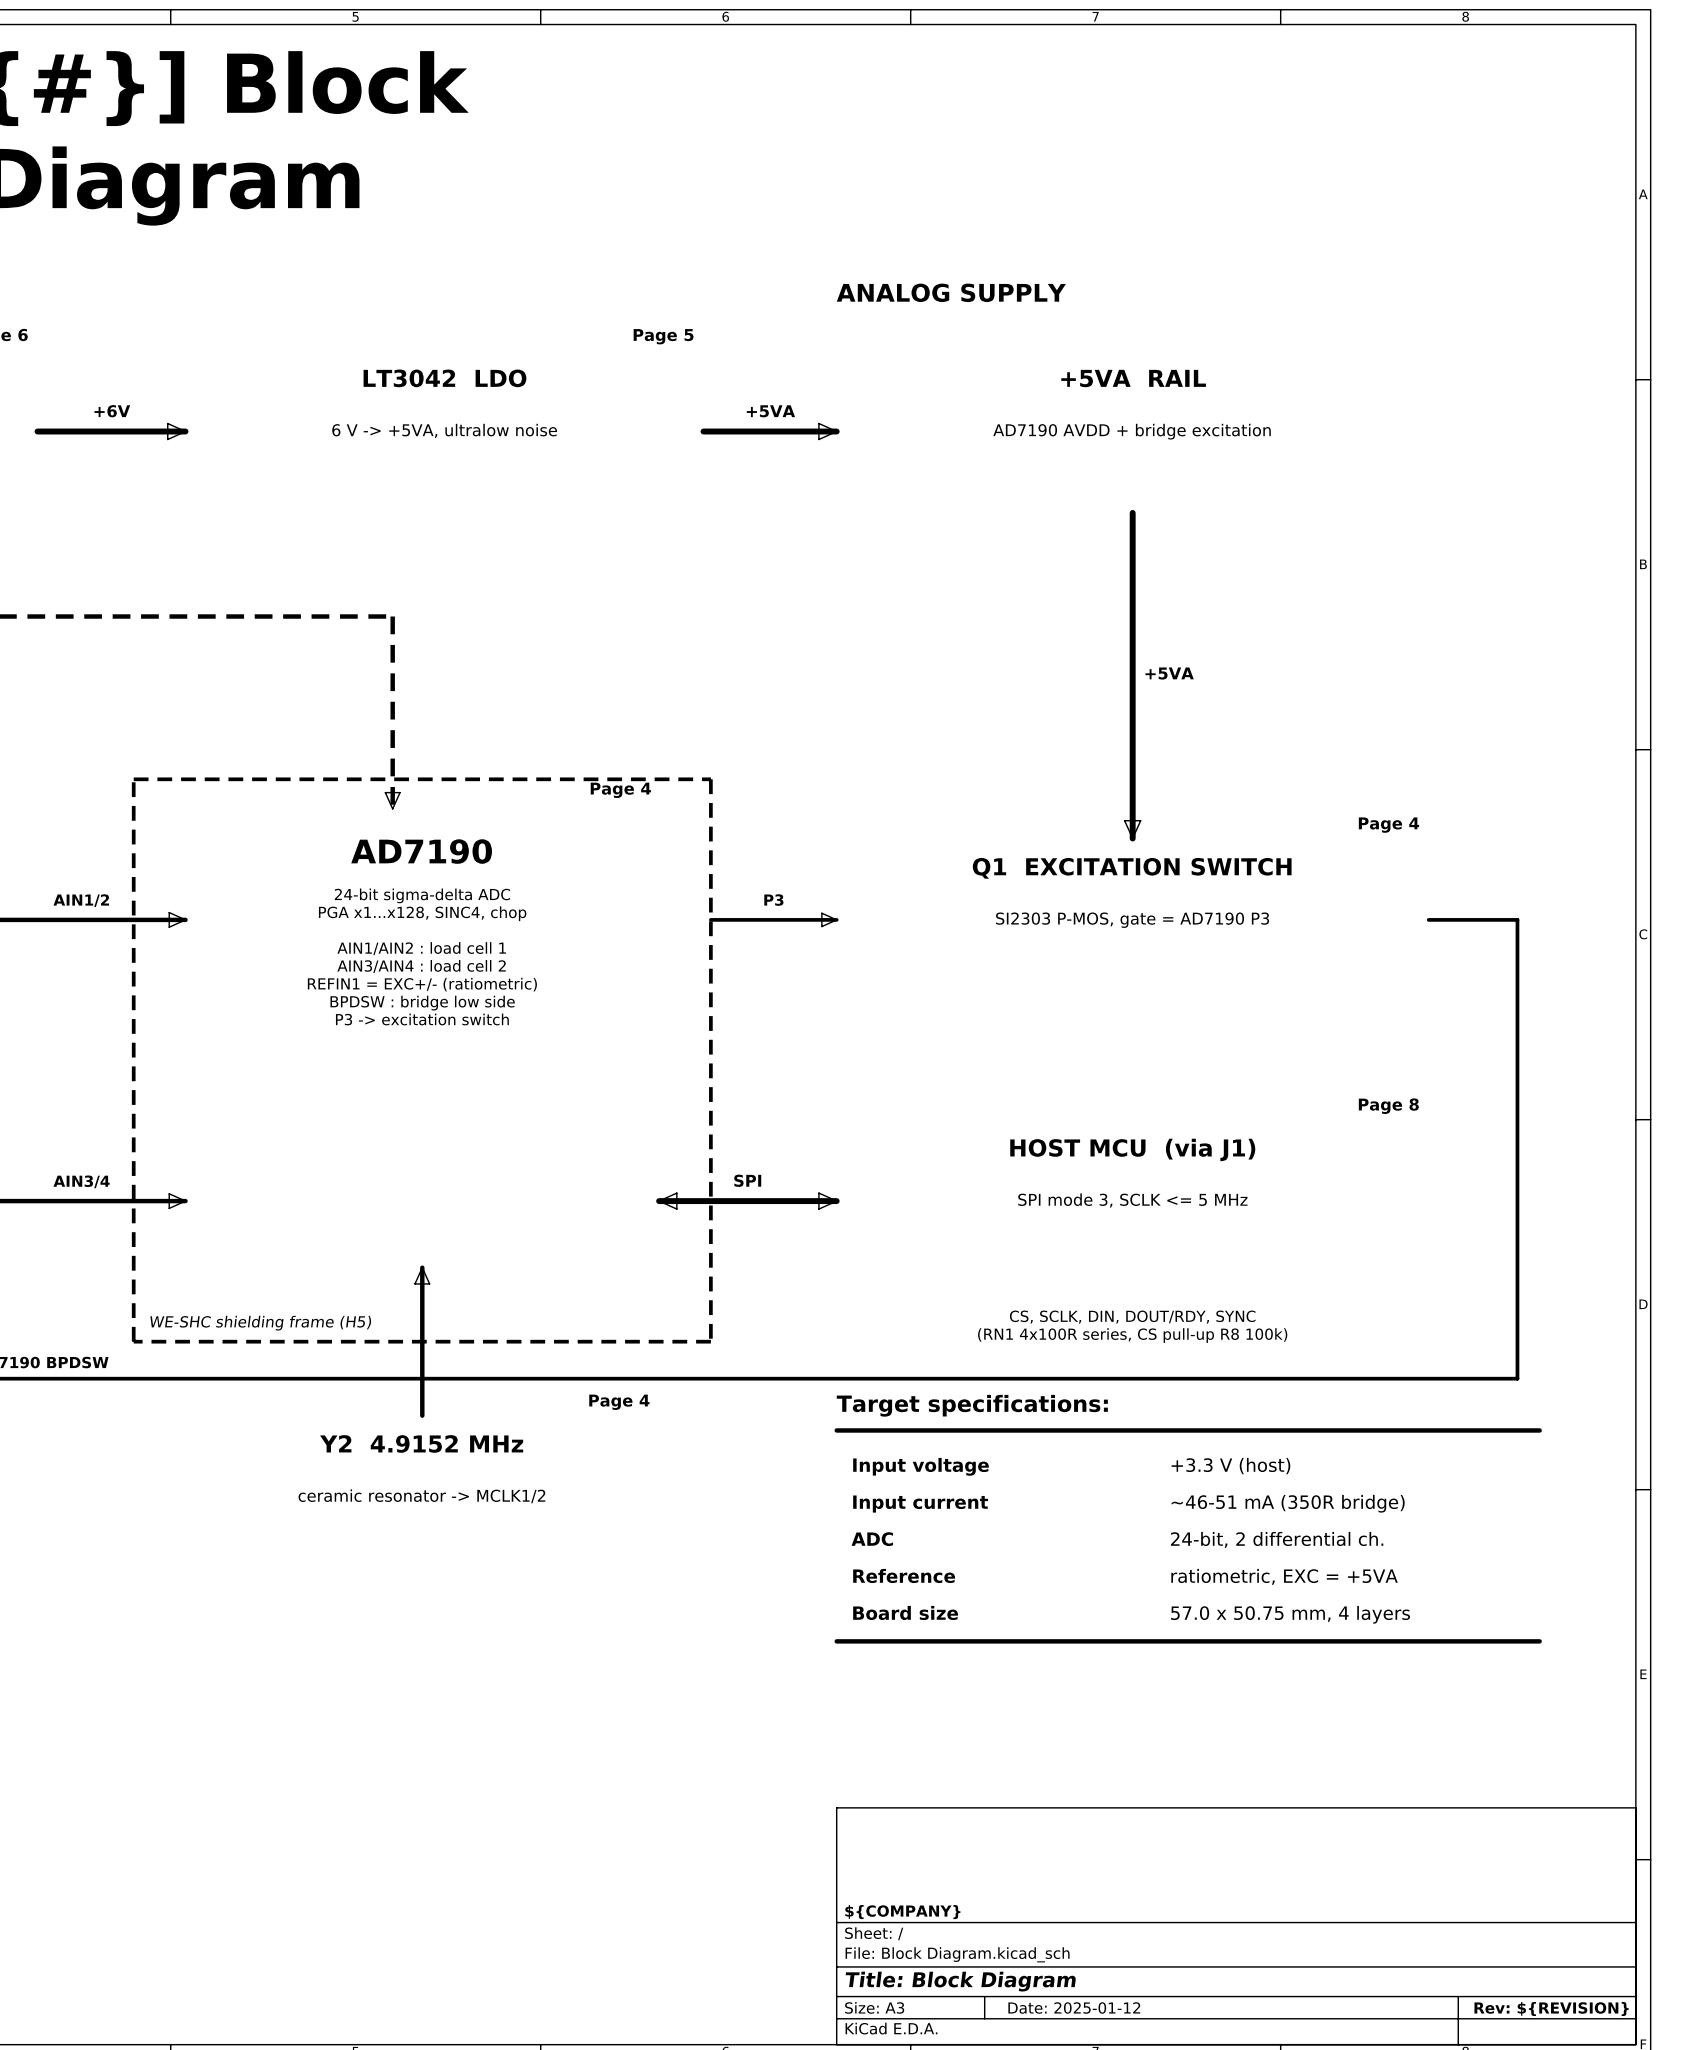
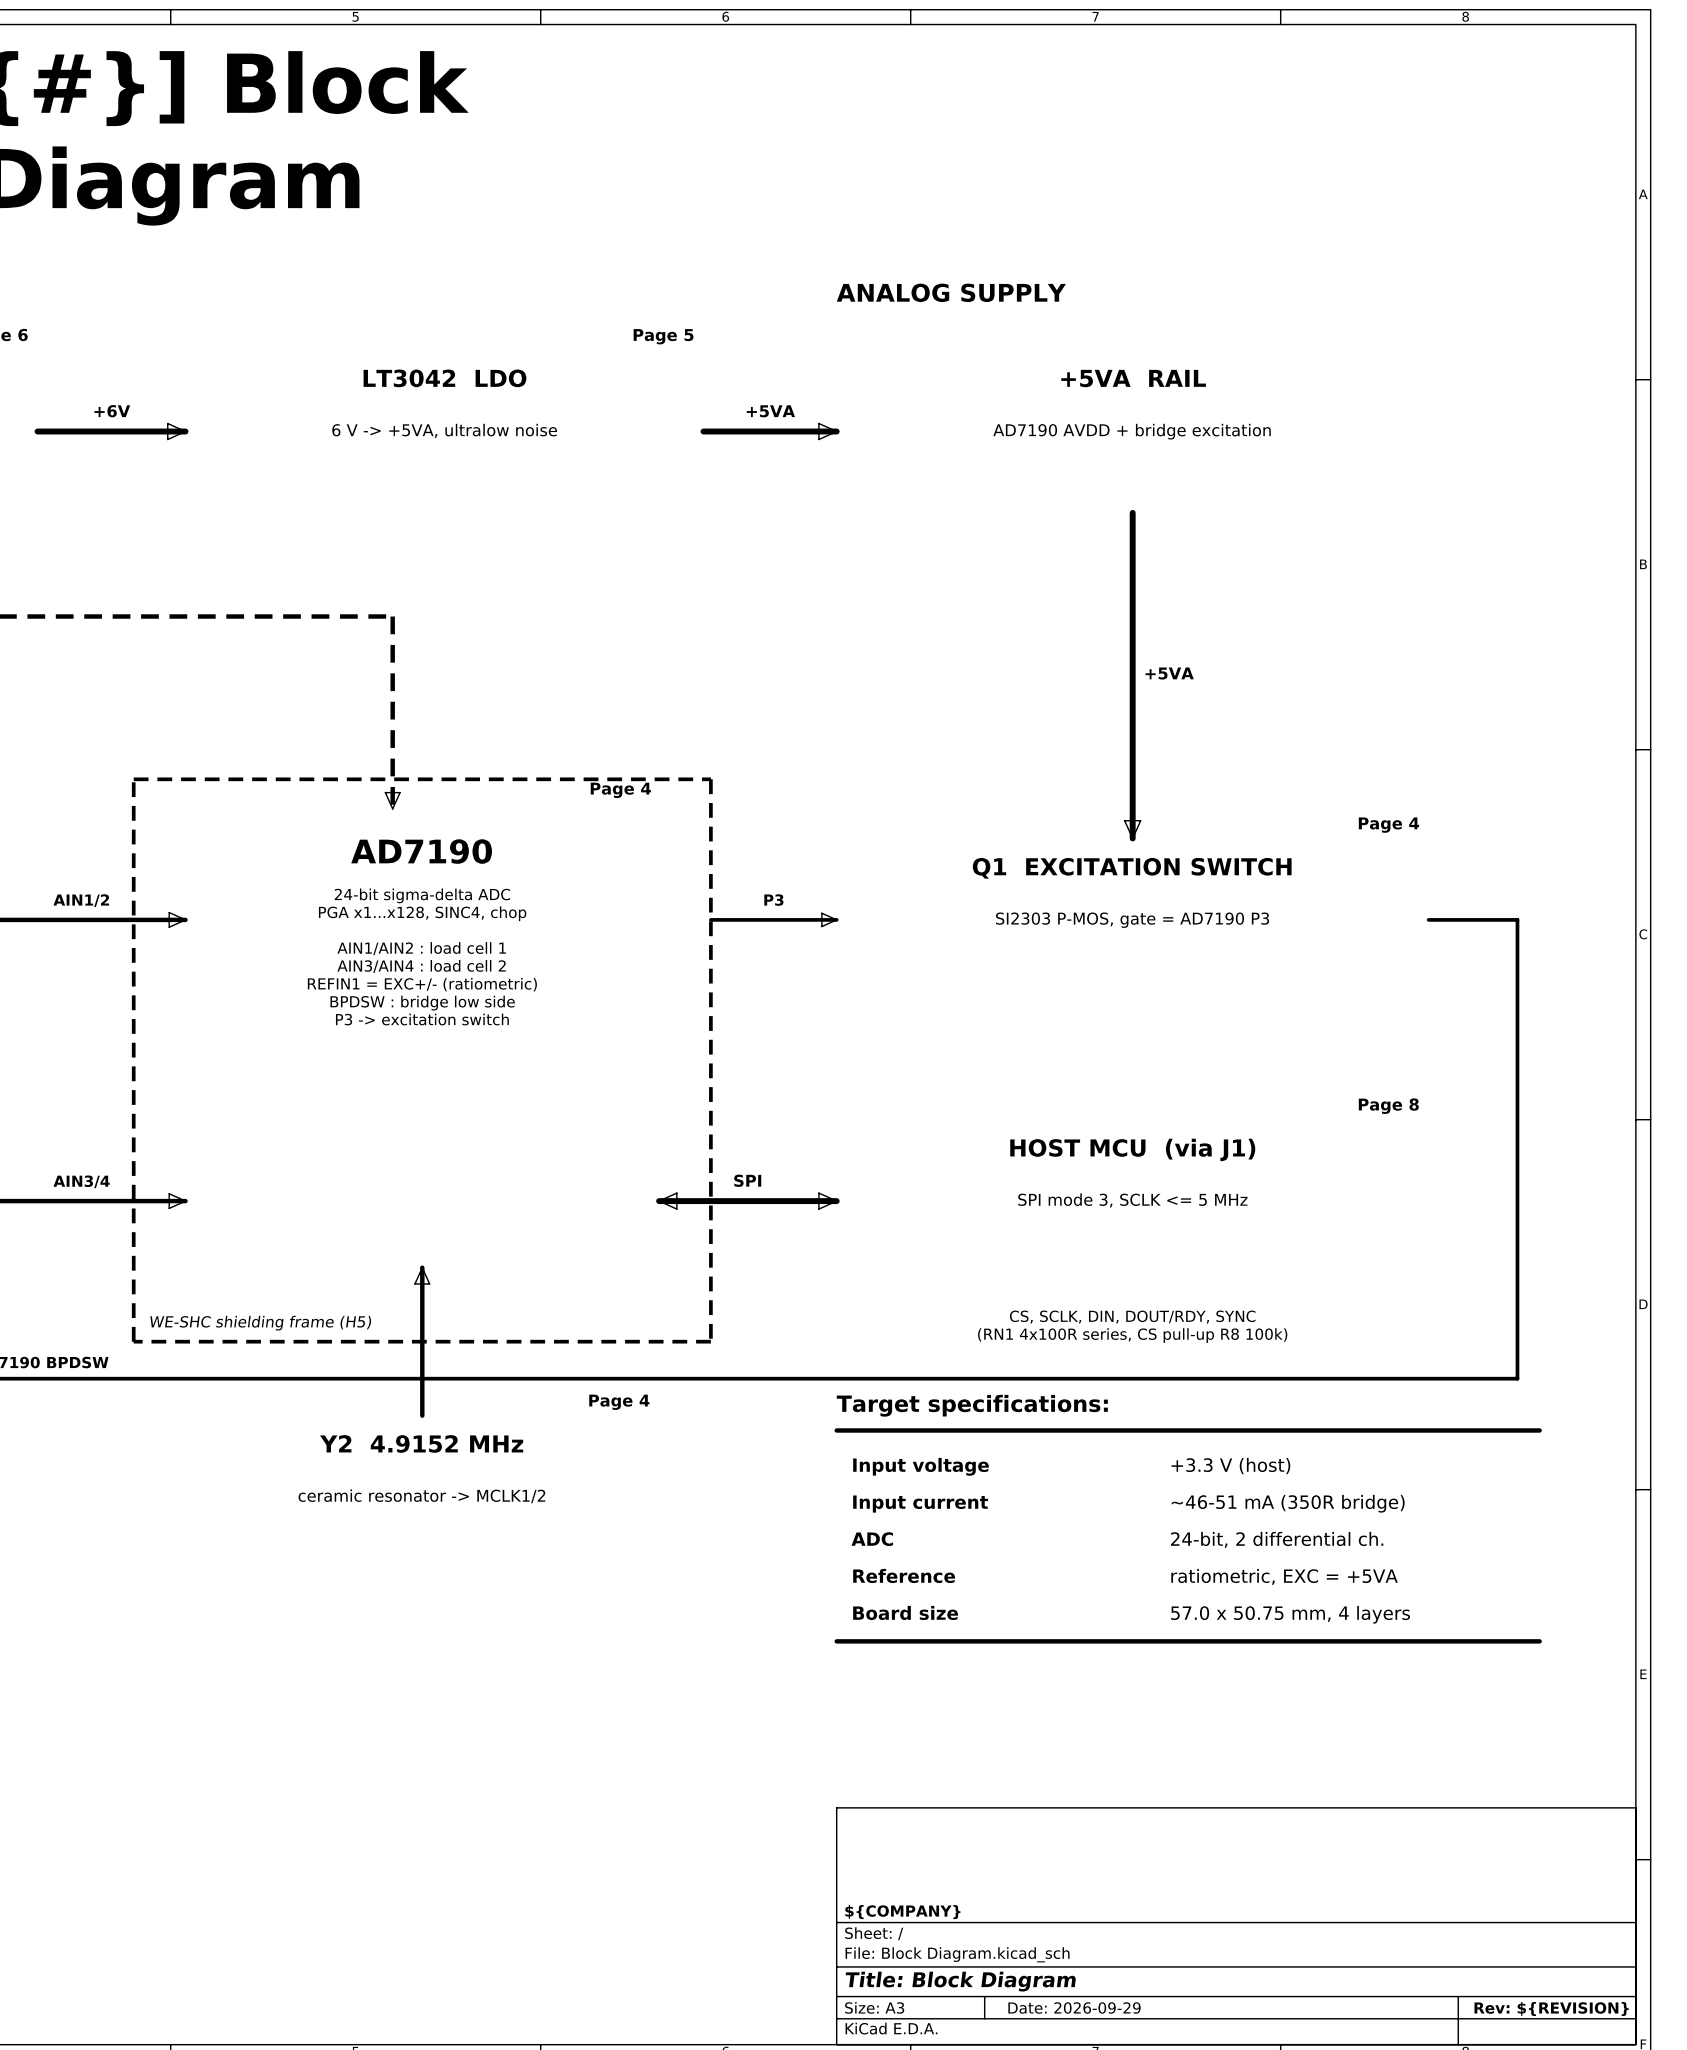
title block: Date: 2025-01-12 (1074, 2008) -> Date: 2026-09-29 (1074, 2008)

